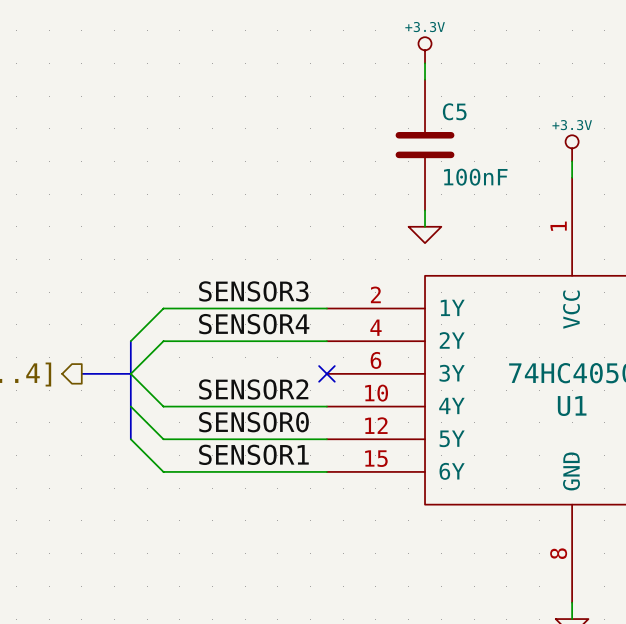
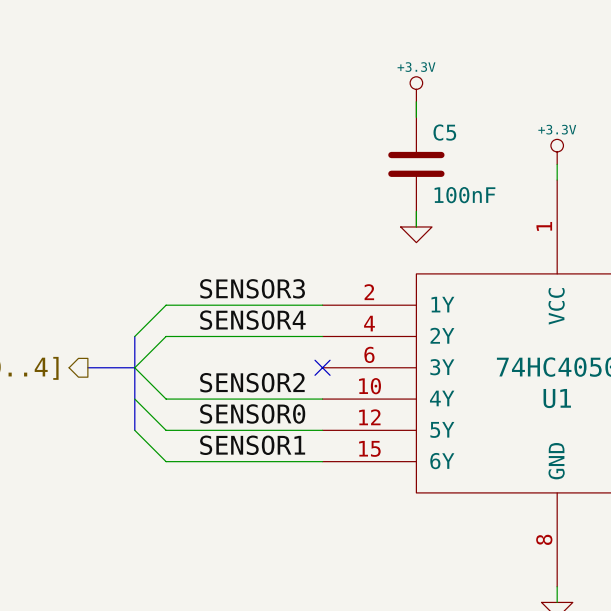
power symbol position: +3.3V (425, 50) -> +3.3V (416, 89)
C5 position: (425, 145) -> (416, 164)

